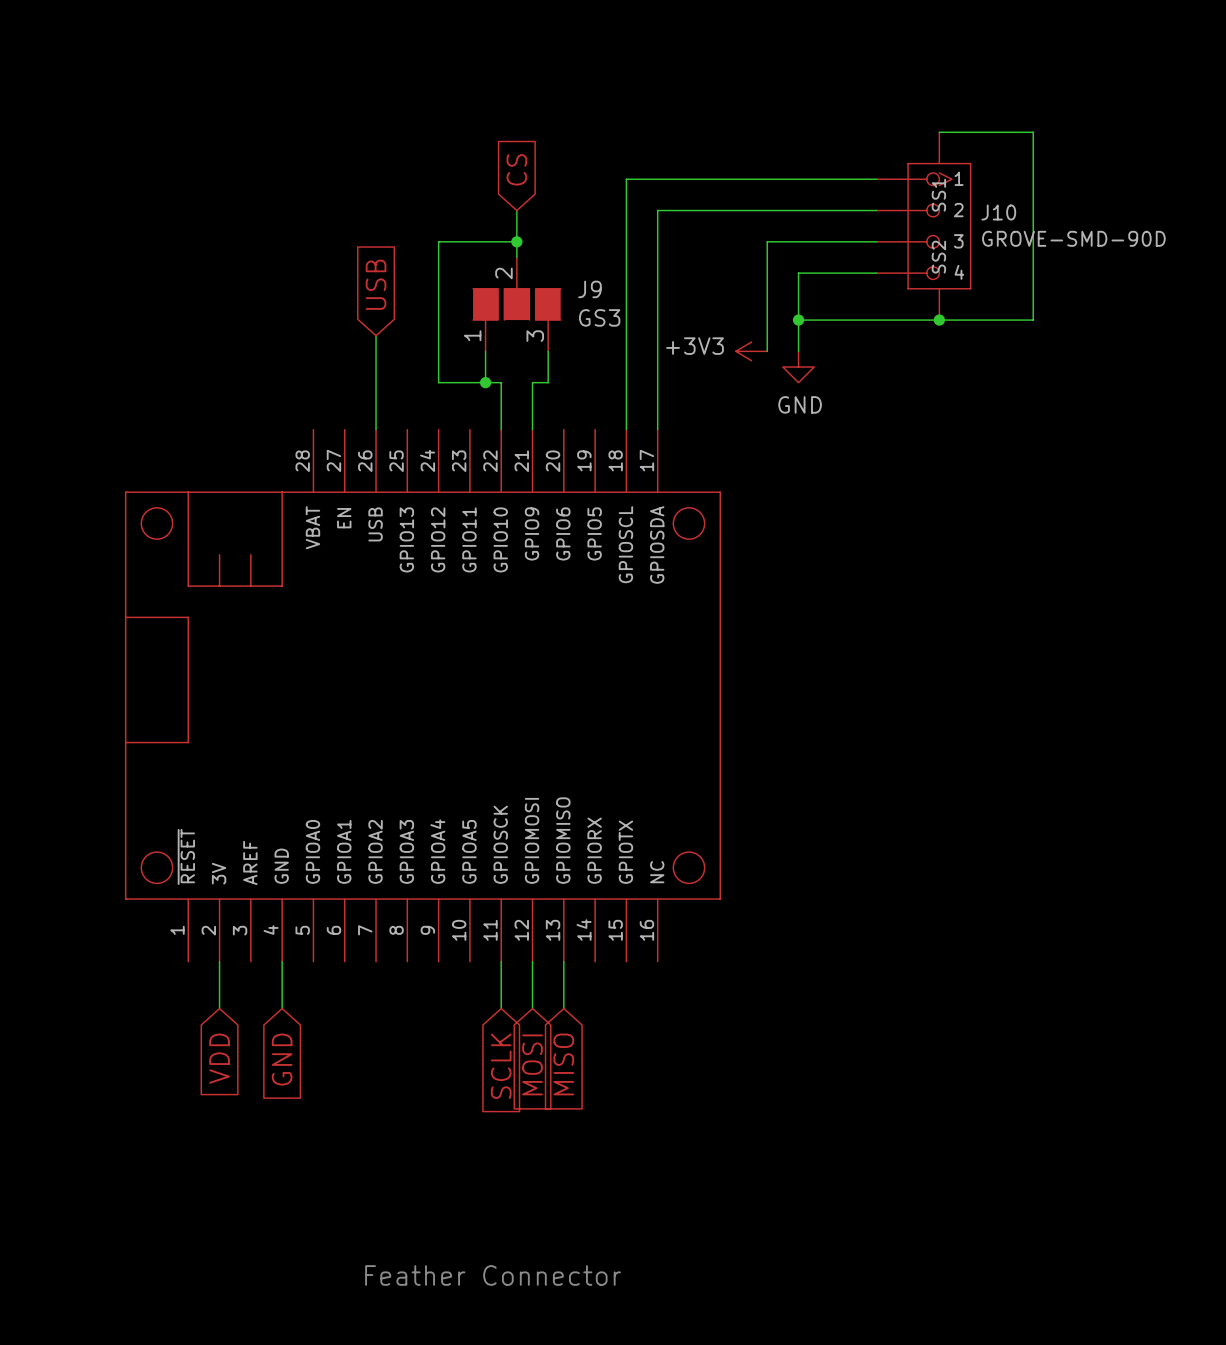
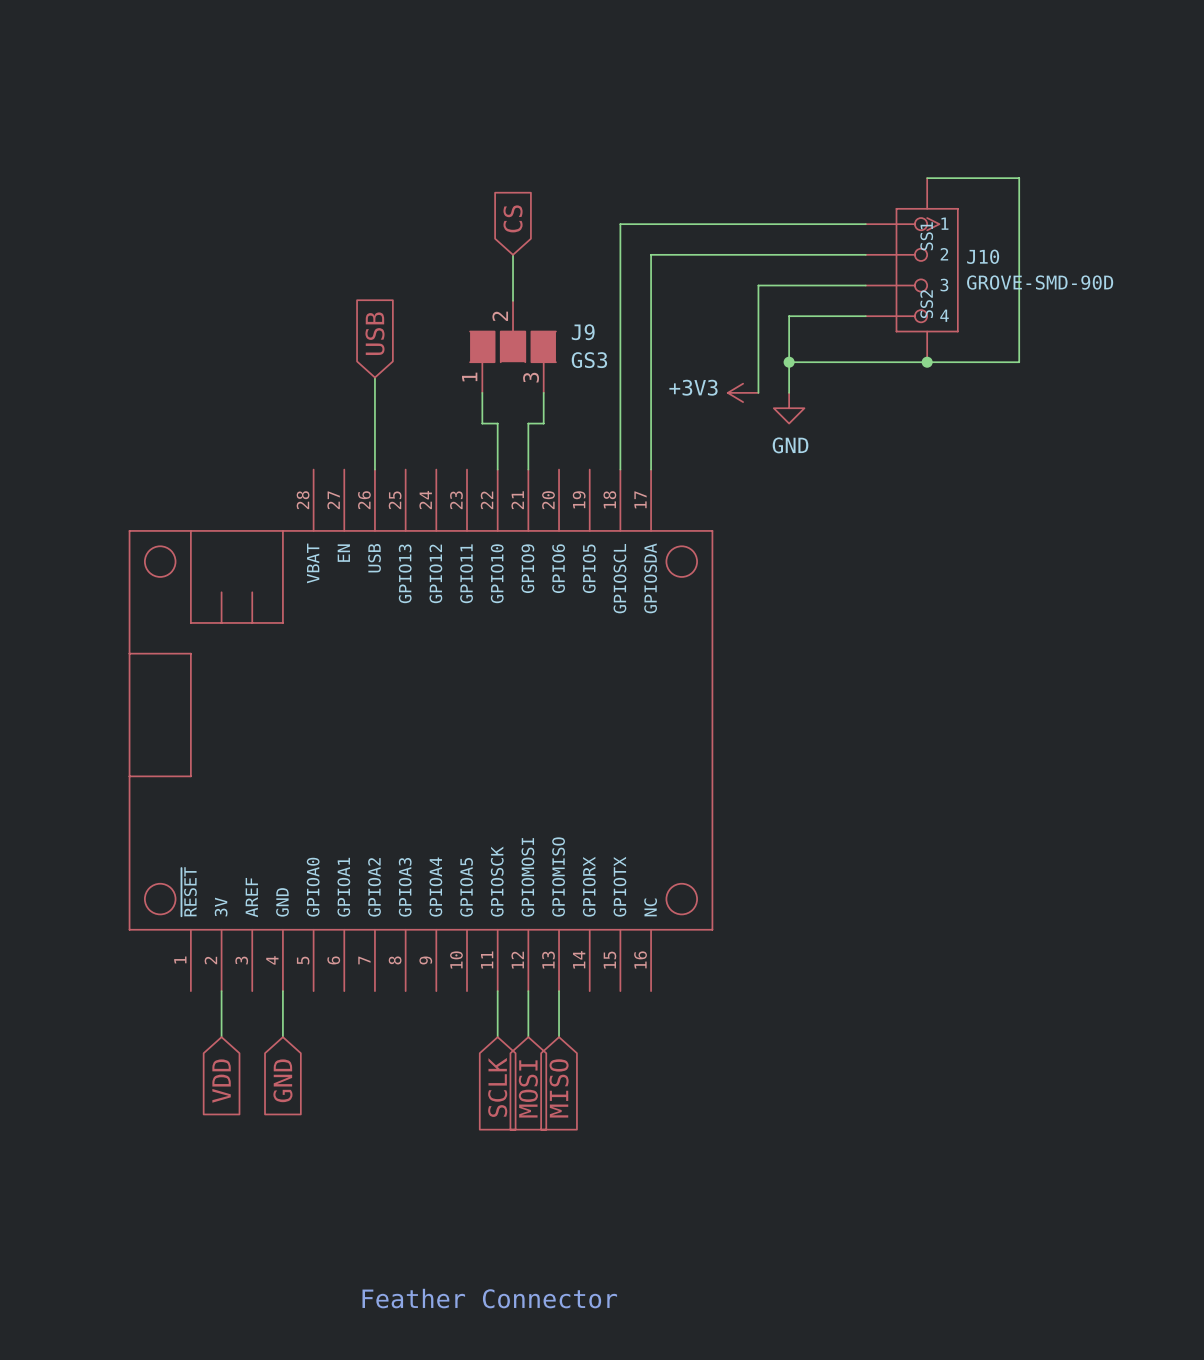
wire: (516, 241) (438, 241) (438, 382) (485, 382) -> none
junction: (516, 241) -> none
junction: (485, 382) -> none

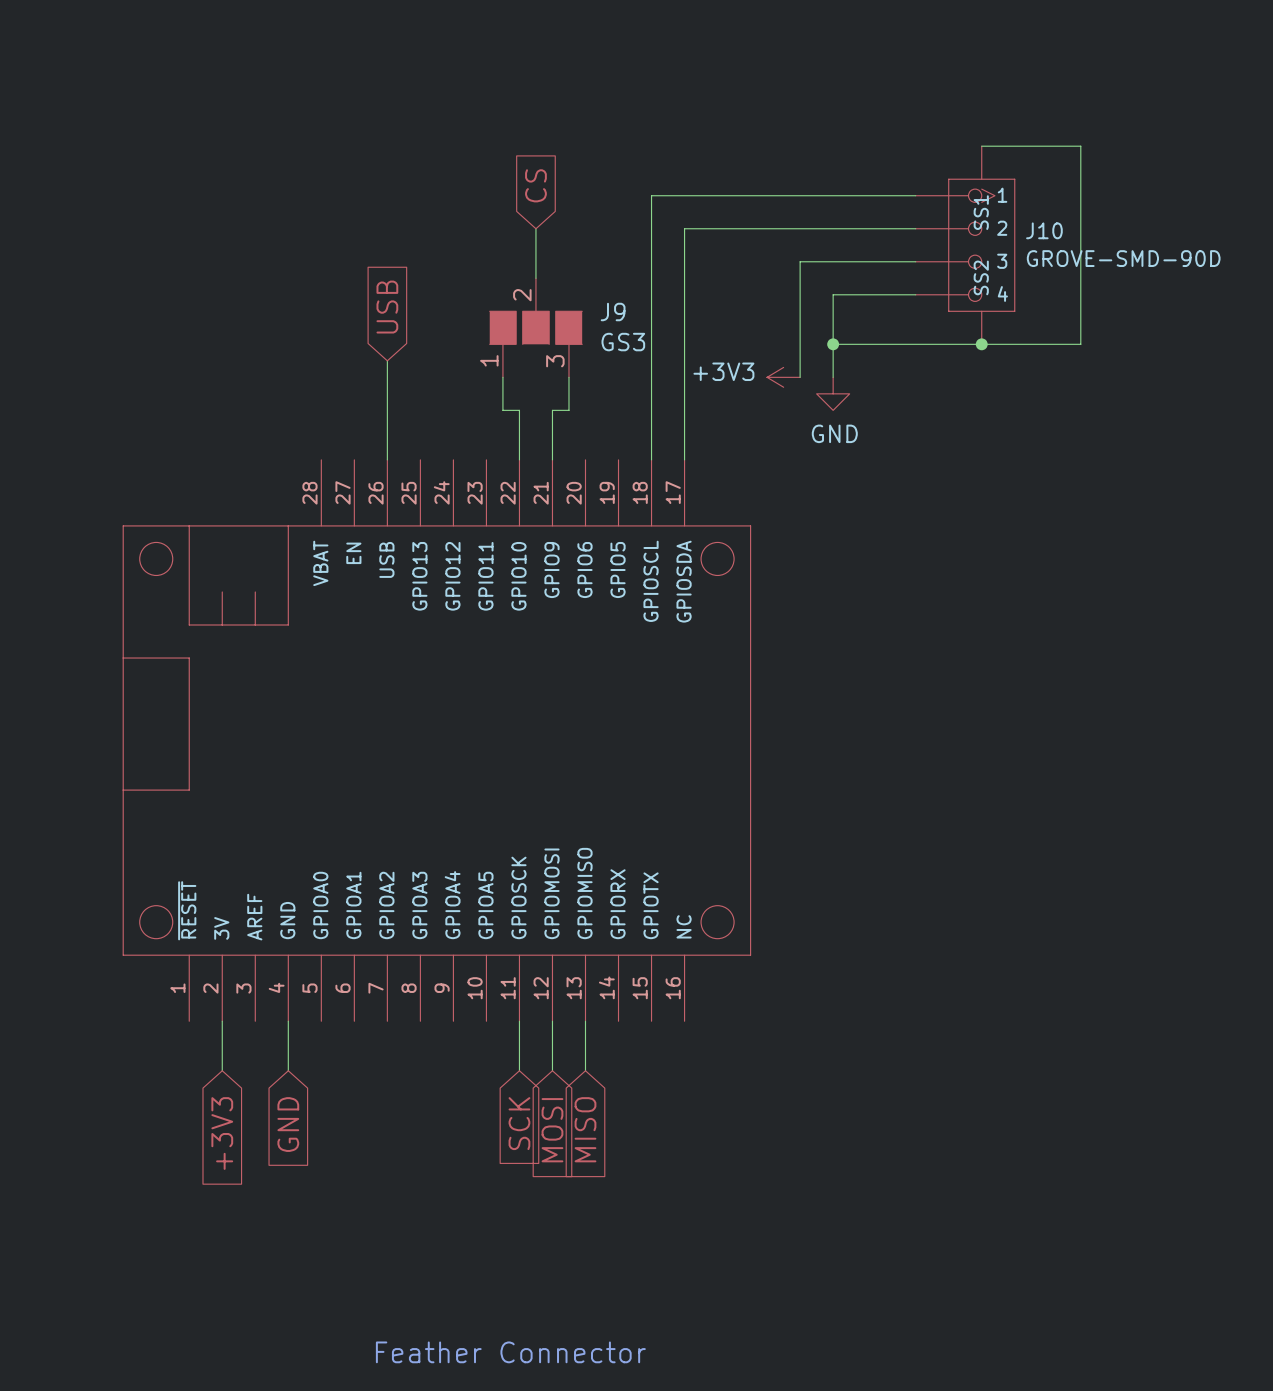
global label: VDD (221, 1081) -> +3V3 (222, 1133)
global label: SCLK (497, 1087) -> SCK (519, 1123)

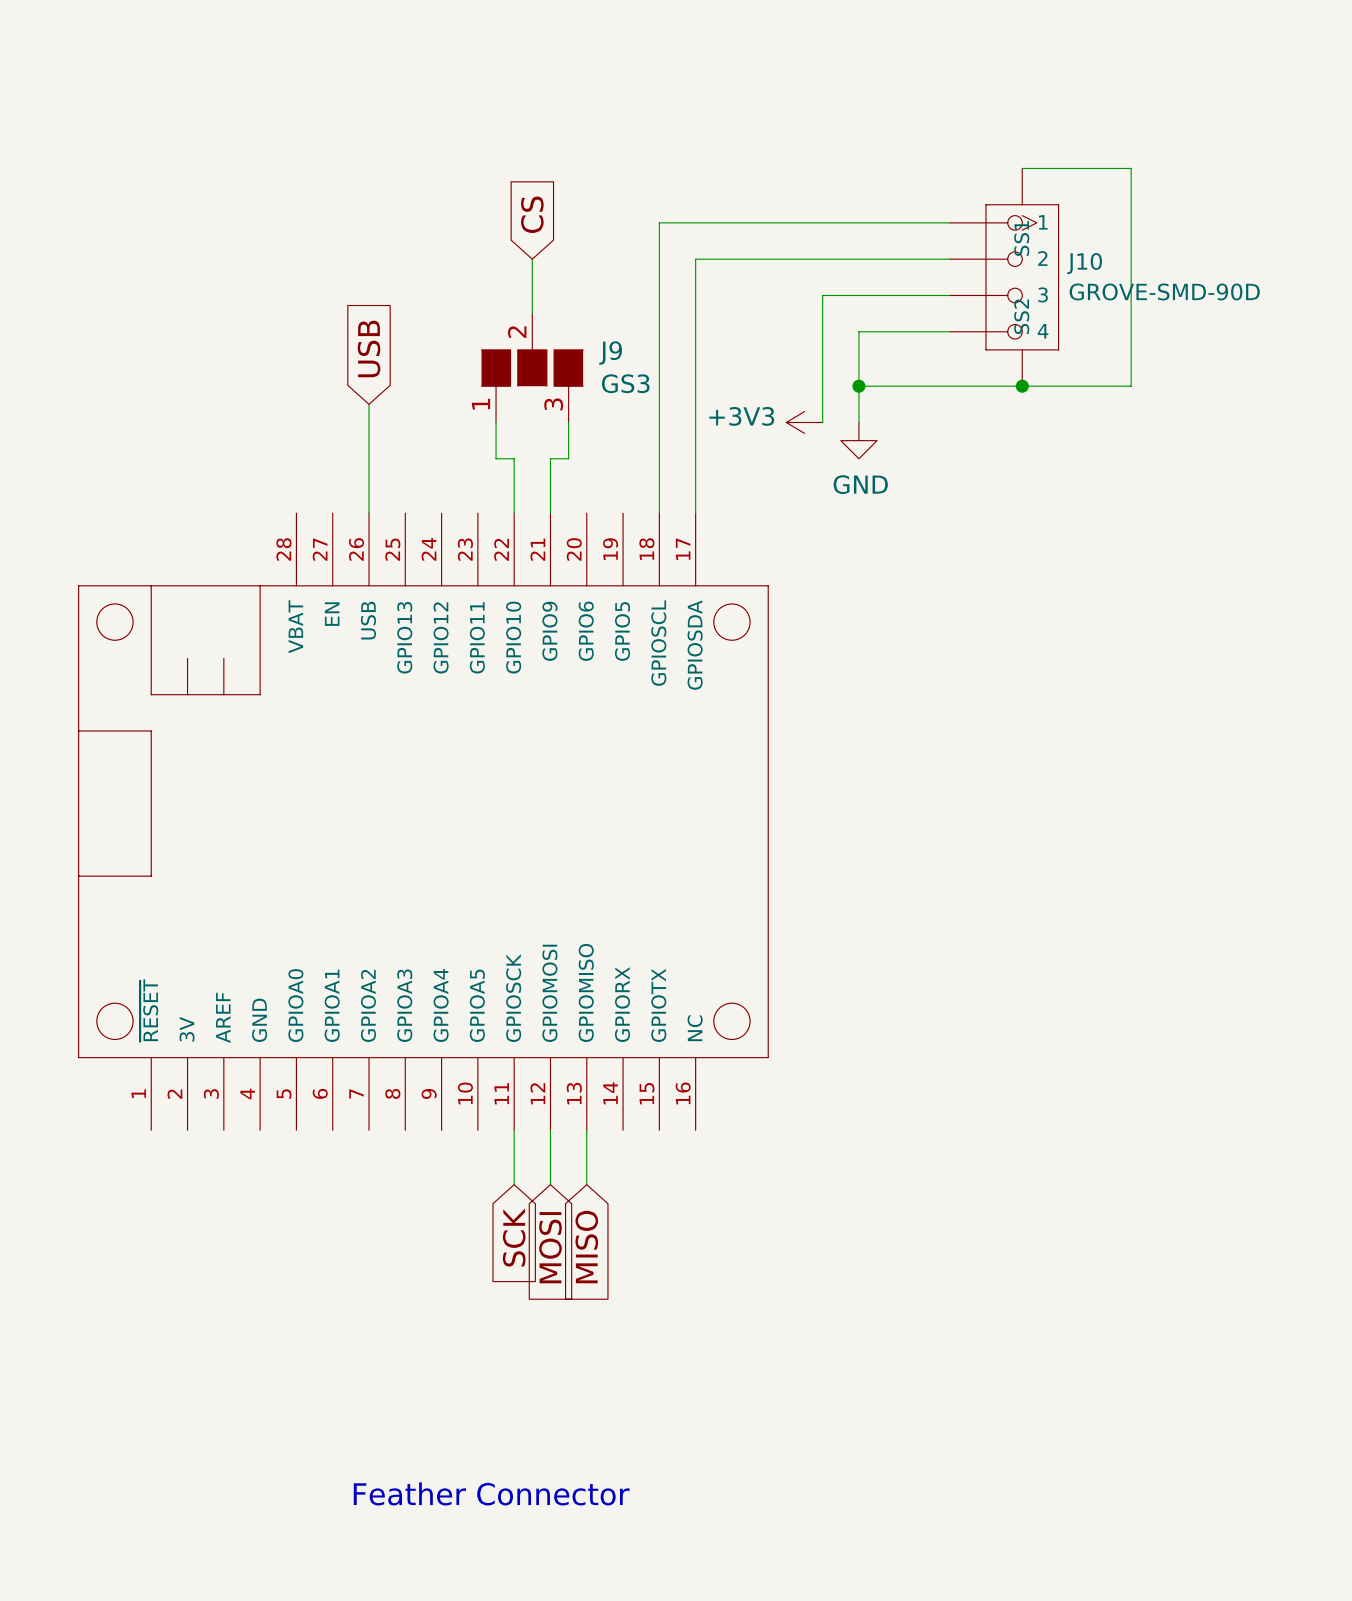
wire: (222, 1021) (222, 1070) -> none
wire: (288, 1021) (288, 1070) -> none
global label: GND (288, 1124) -> none
global label: +3V3 (222, 1133) -> none

